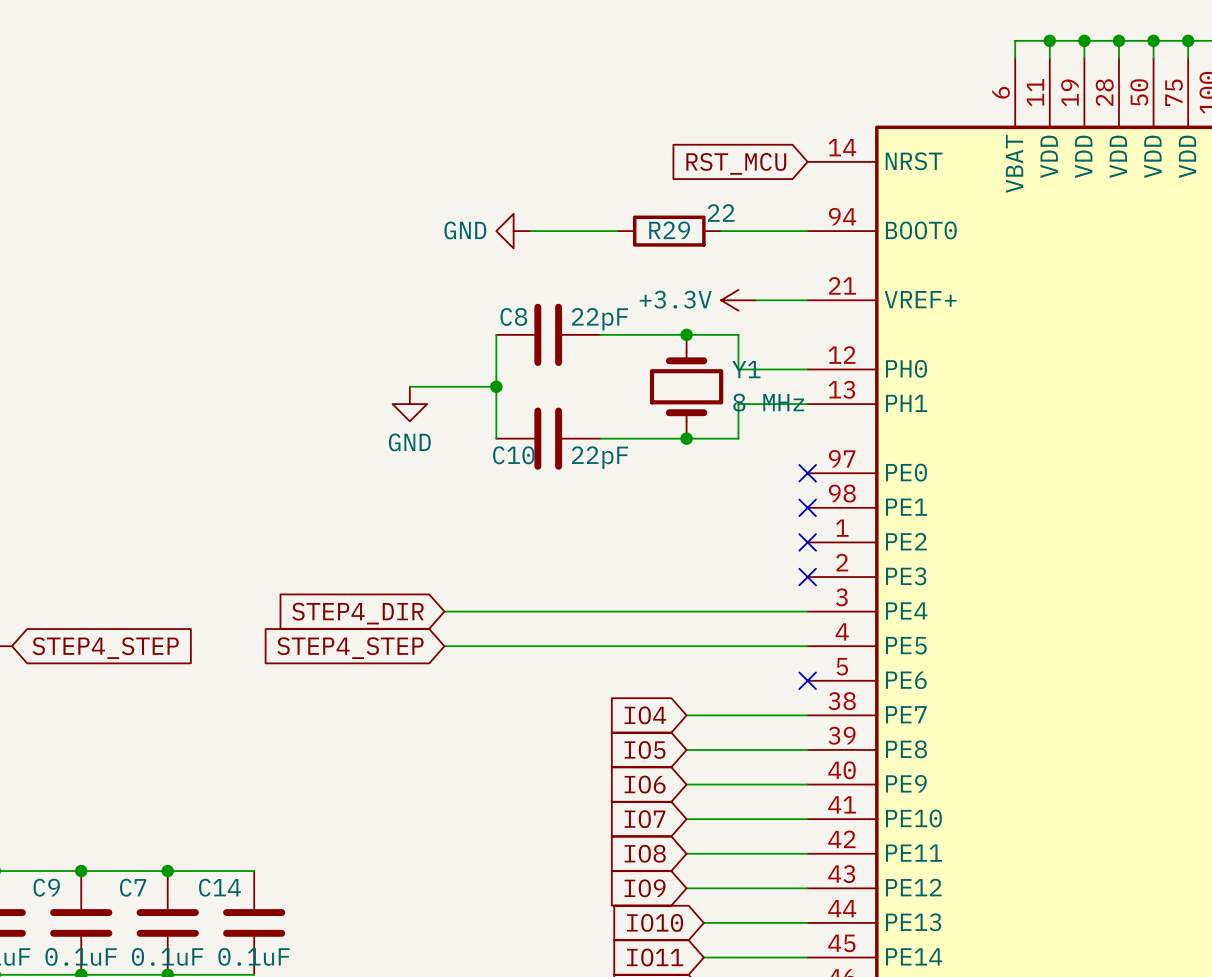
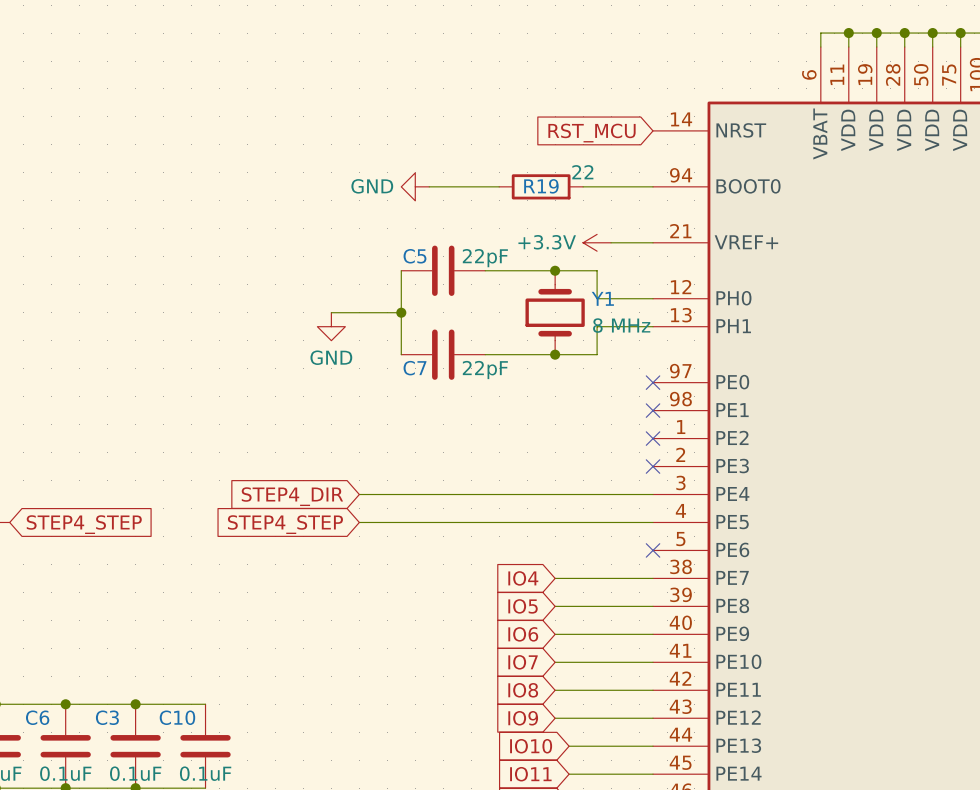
R29 name: R29 (669, 230) -> R19 (541, 186)
C8 name: C8 (513, 316) -> C5 (414, 256)
C10 name: C10 (513, 455) -> C7 (415, 368)
C9 name: C9 (46, 887) -> C6 (37, 717)
C7 name: C7 (133, 887) -> C3 (107, 717)
C14 name: C14 (219, 887) -> C10 (177, 717)

